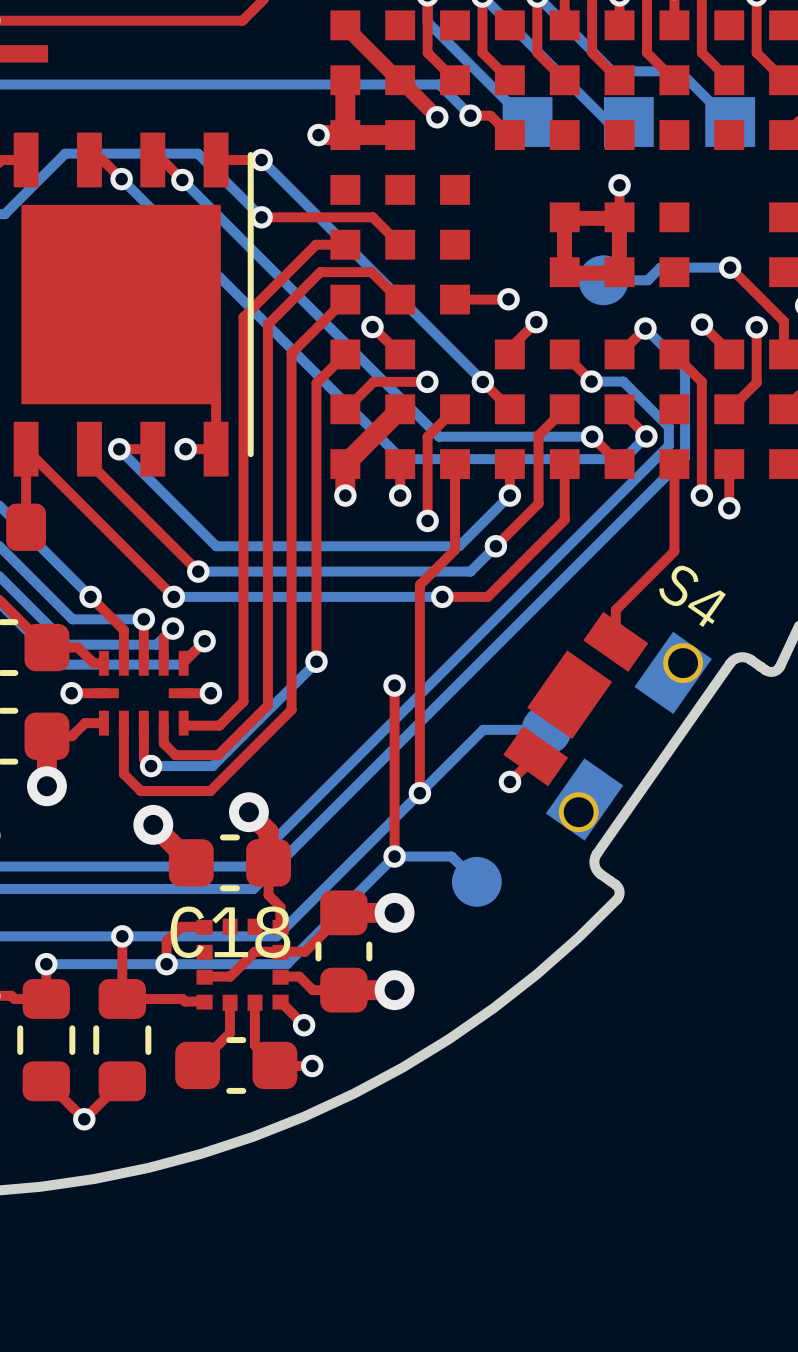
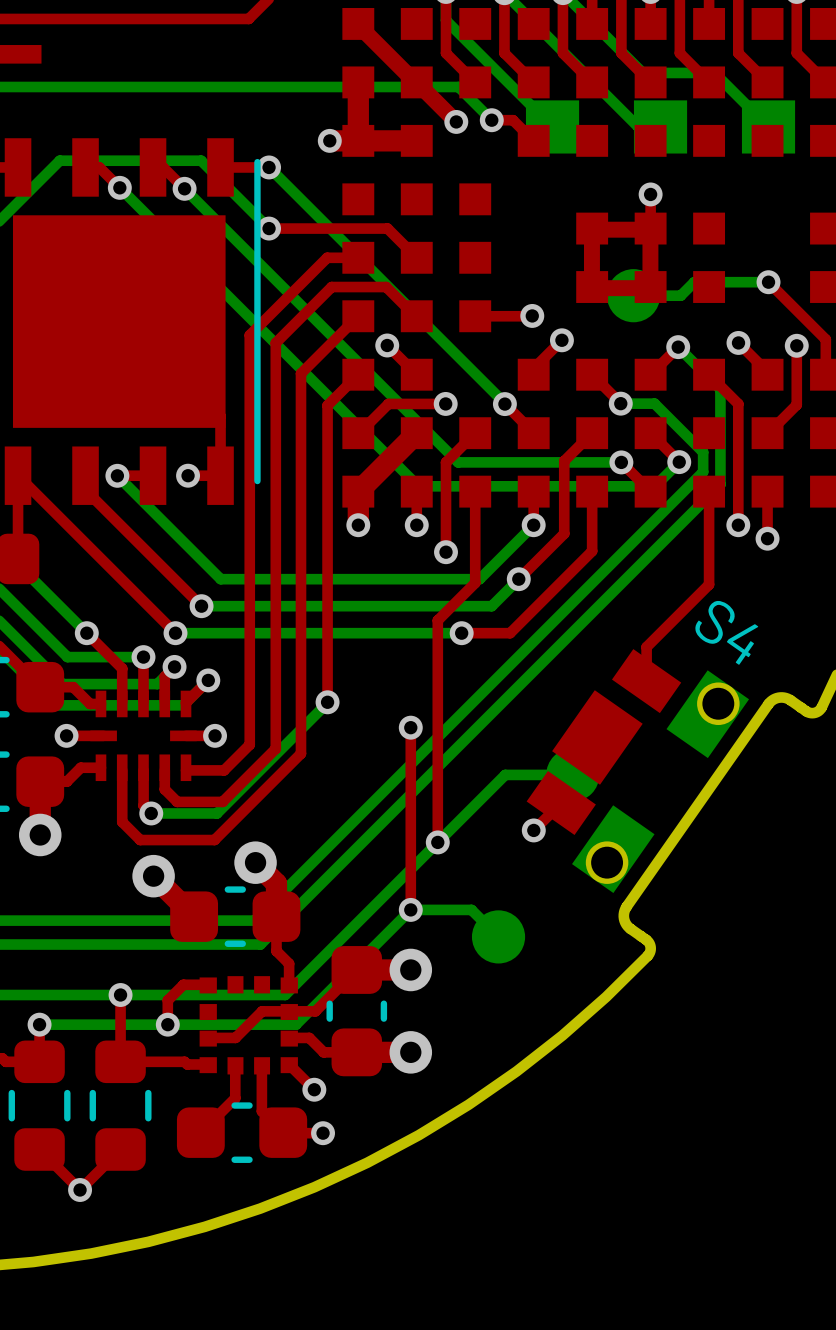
C18 name: C18 (230, 932) -> none

